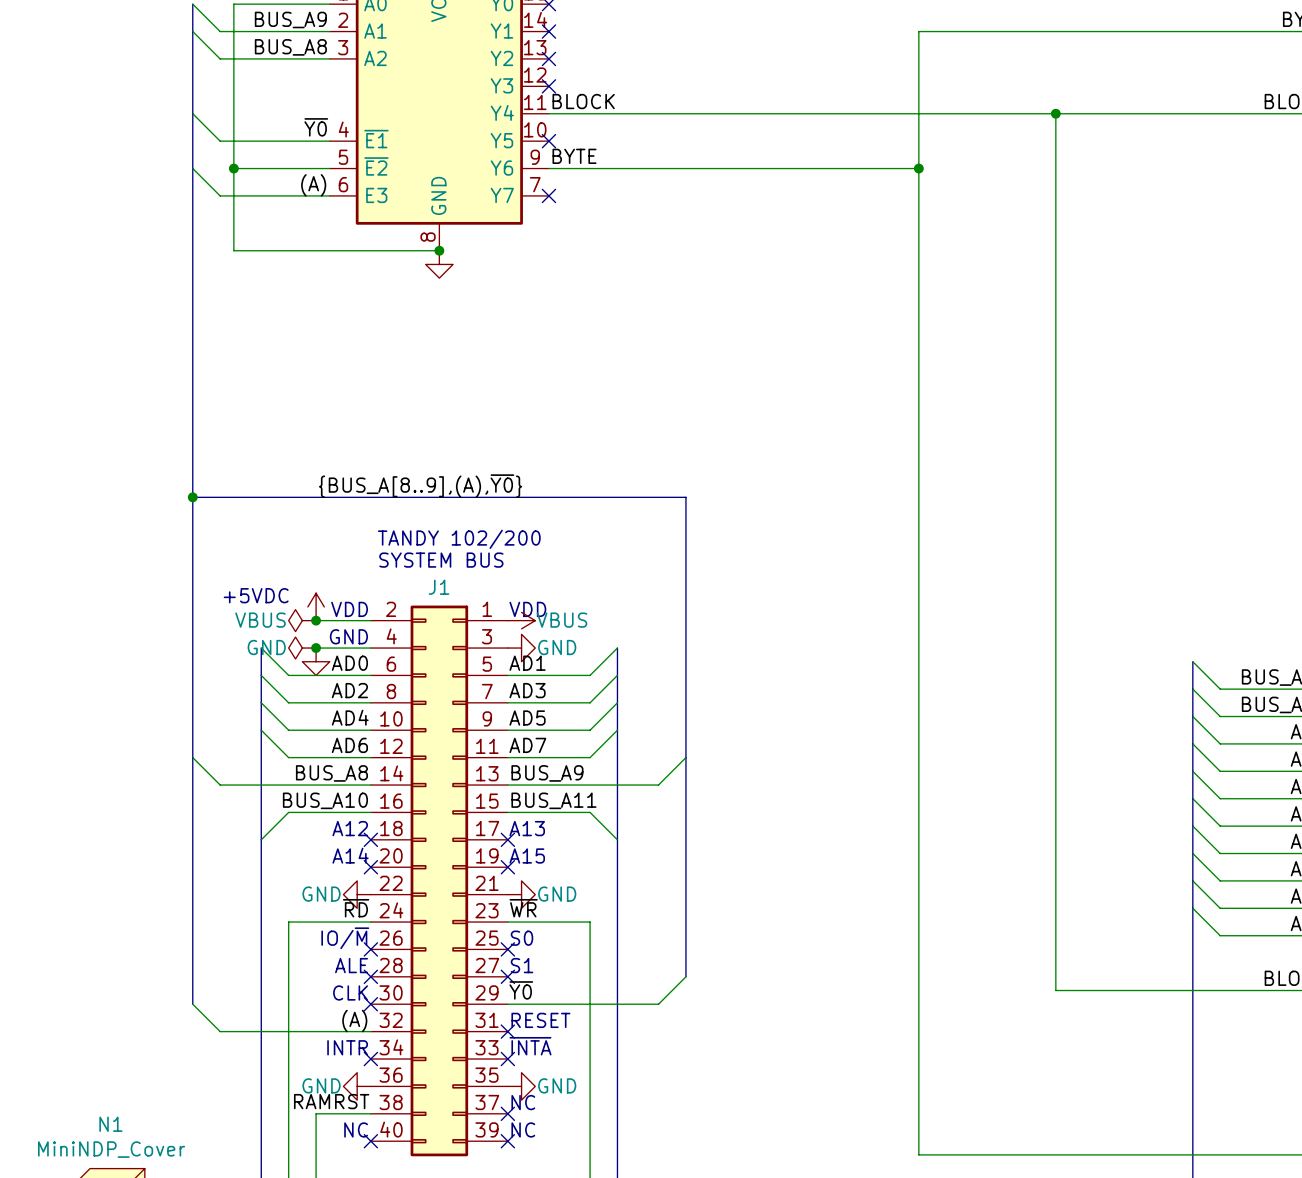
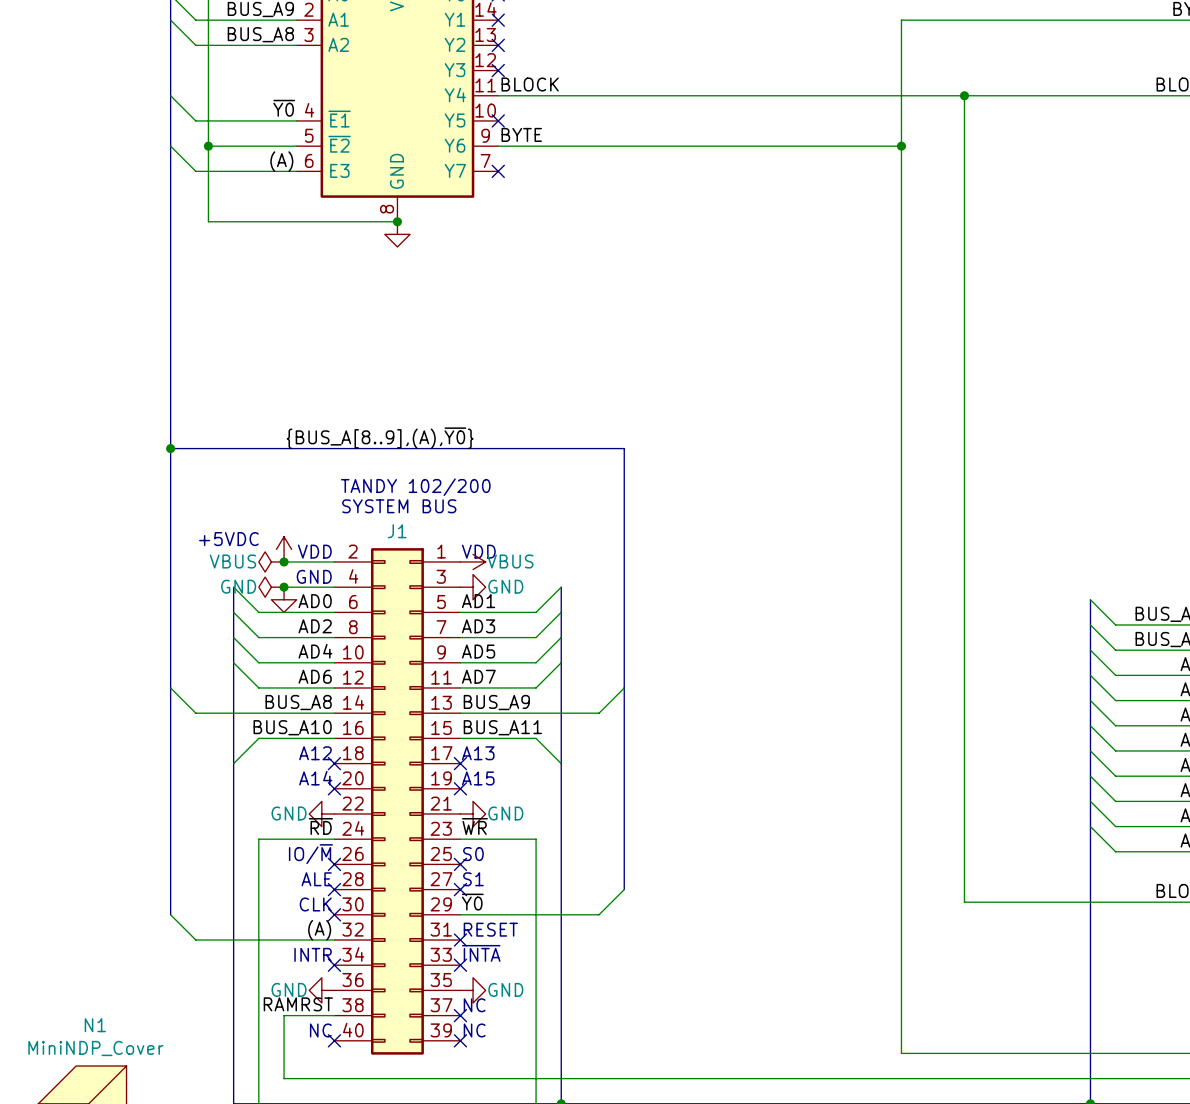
wire: (987, 31) (918, 31) (918, 1154) (987, 1154) -> (901, 20) (901, 1053)
wire: none -> (838, 146) (901, 146)
junction: (918, 168) -> none
junction: none -> (901, 146)

